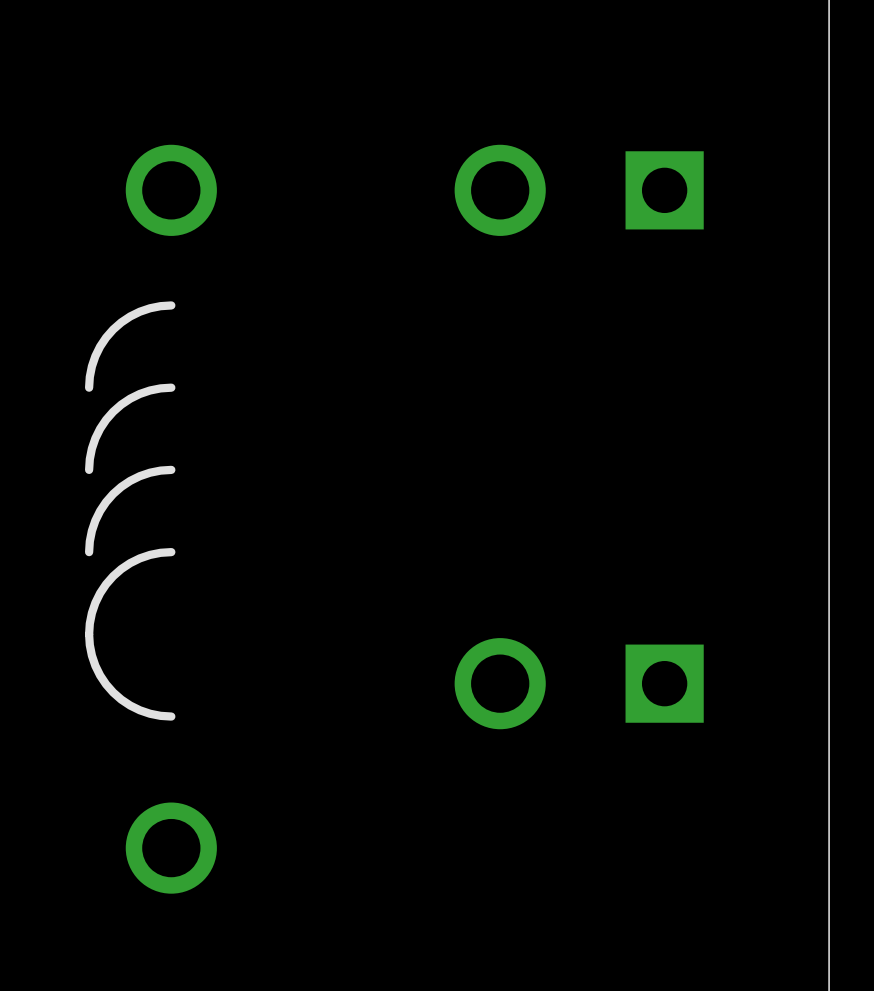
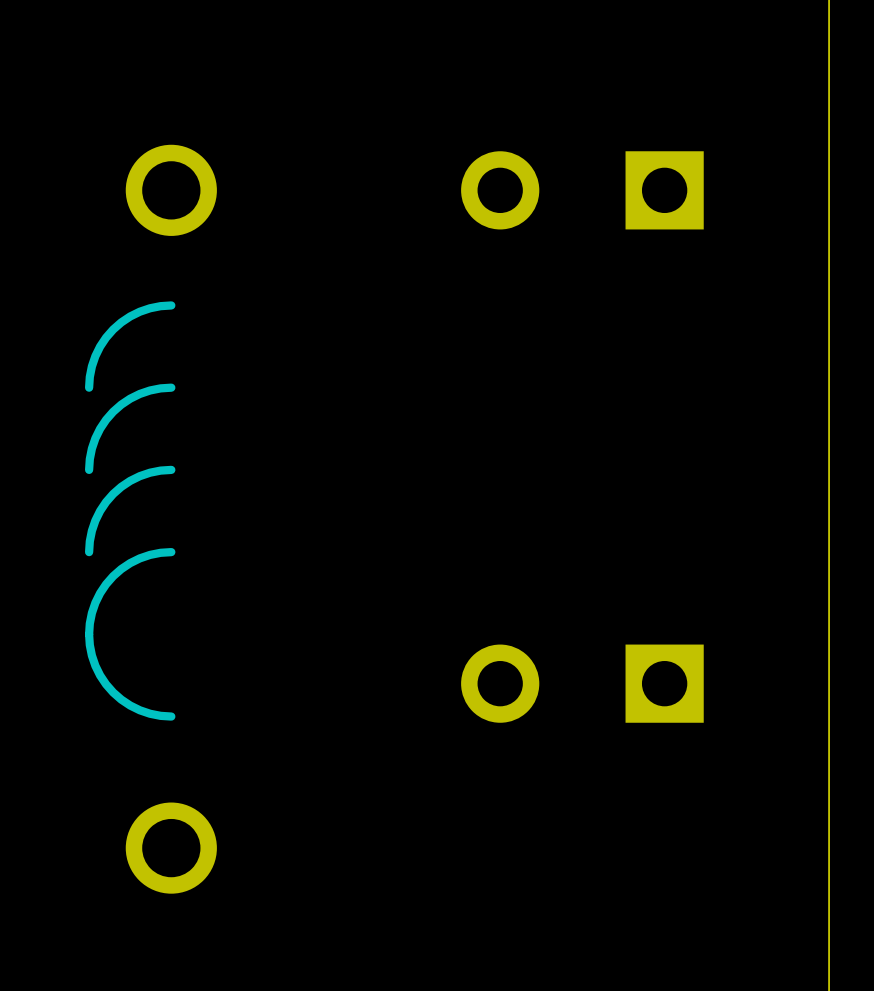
part footprint: [454, 144, 704, 236] -> [461, 151, 704, 230]
part footprint: [454, 638, 704, 730] -> [461, 644, 704, 723]

